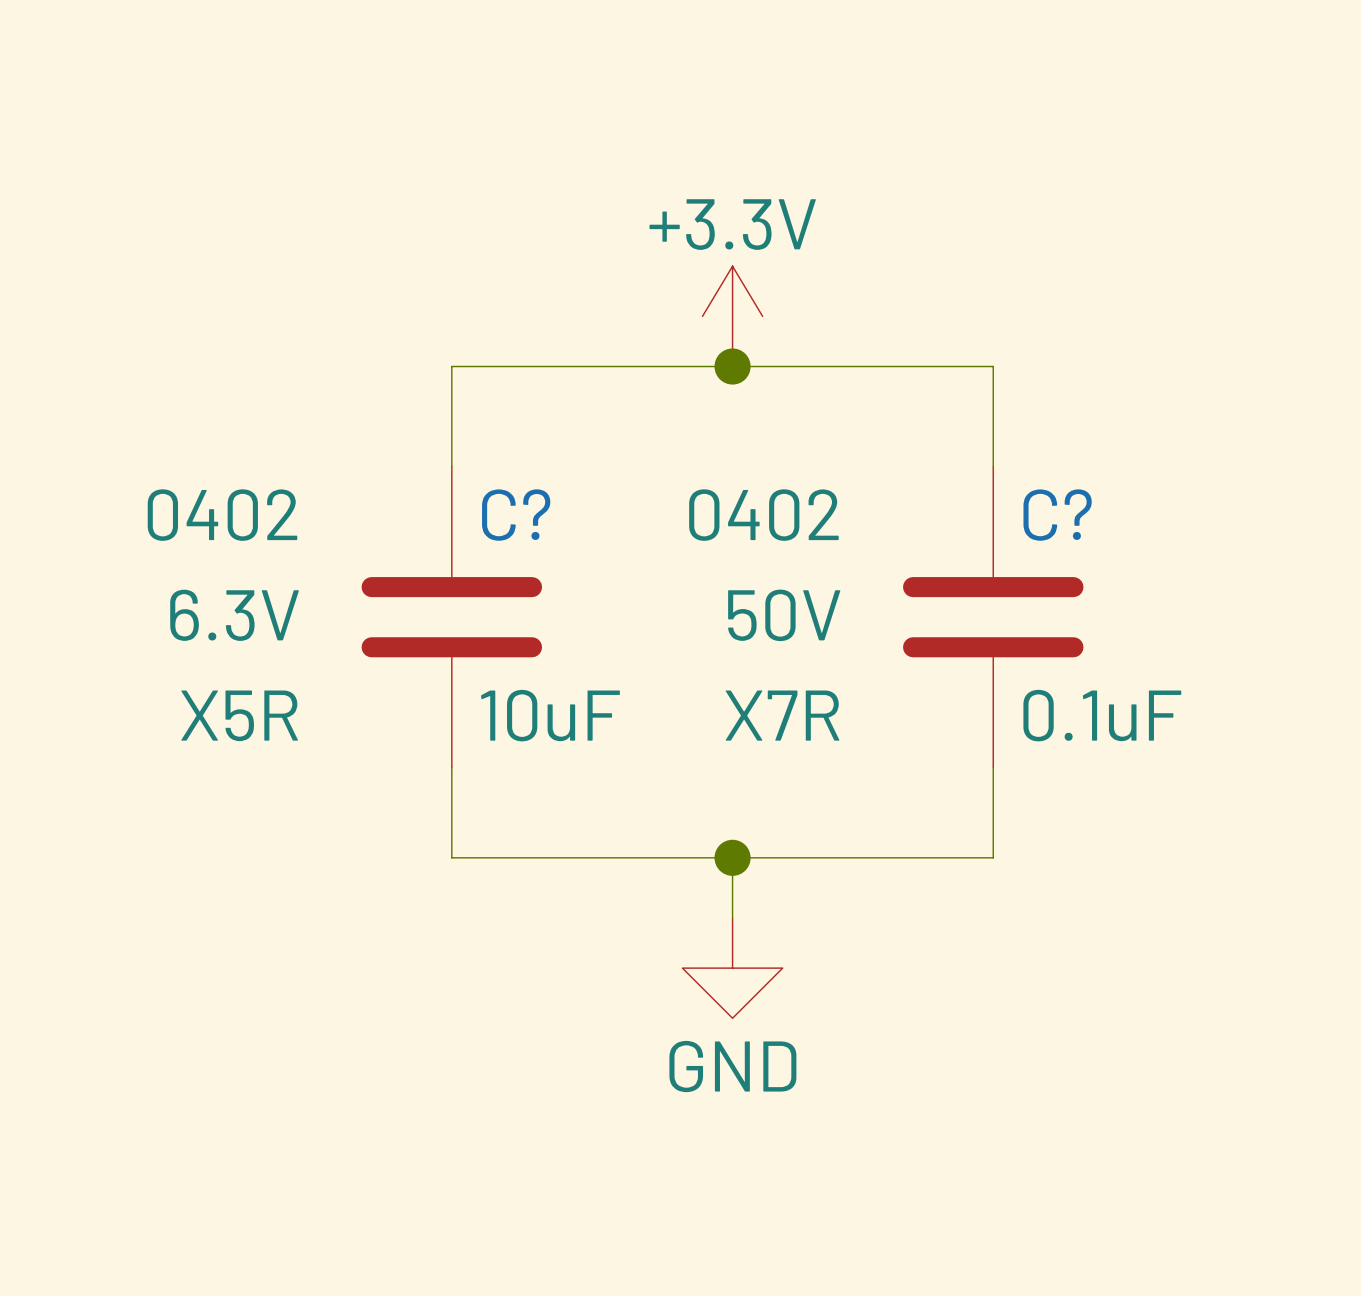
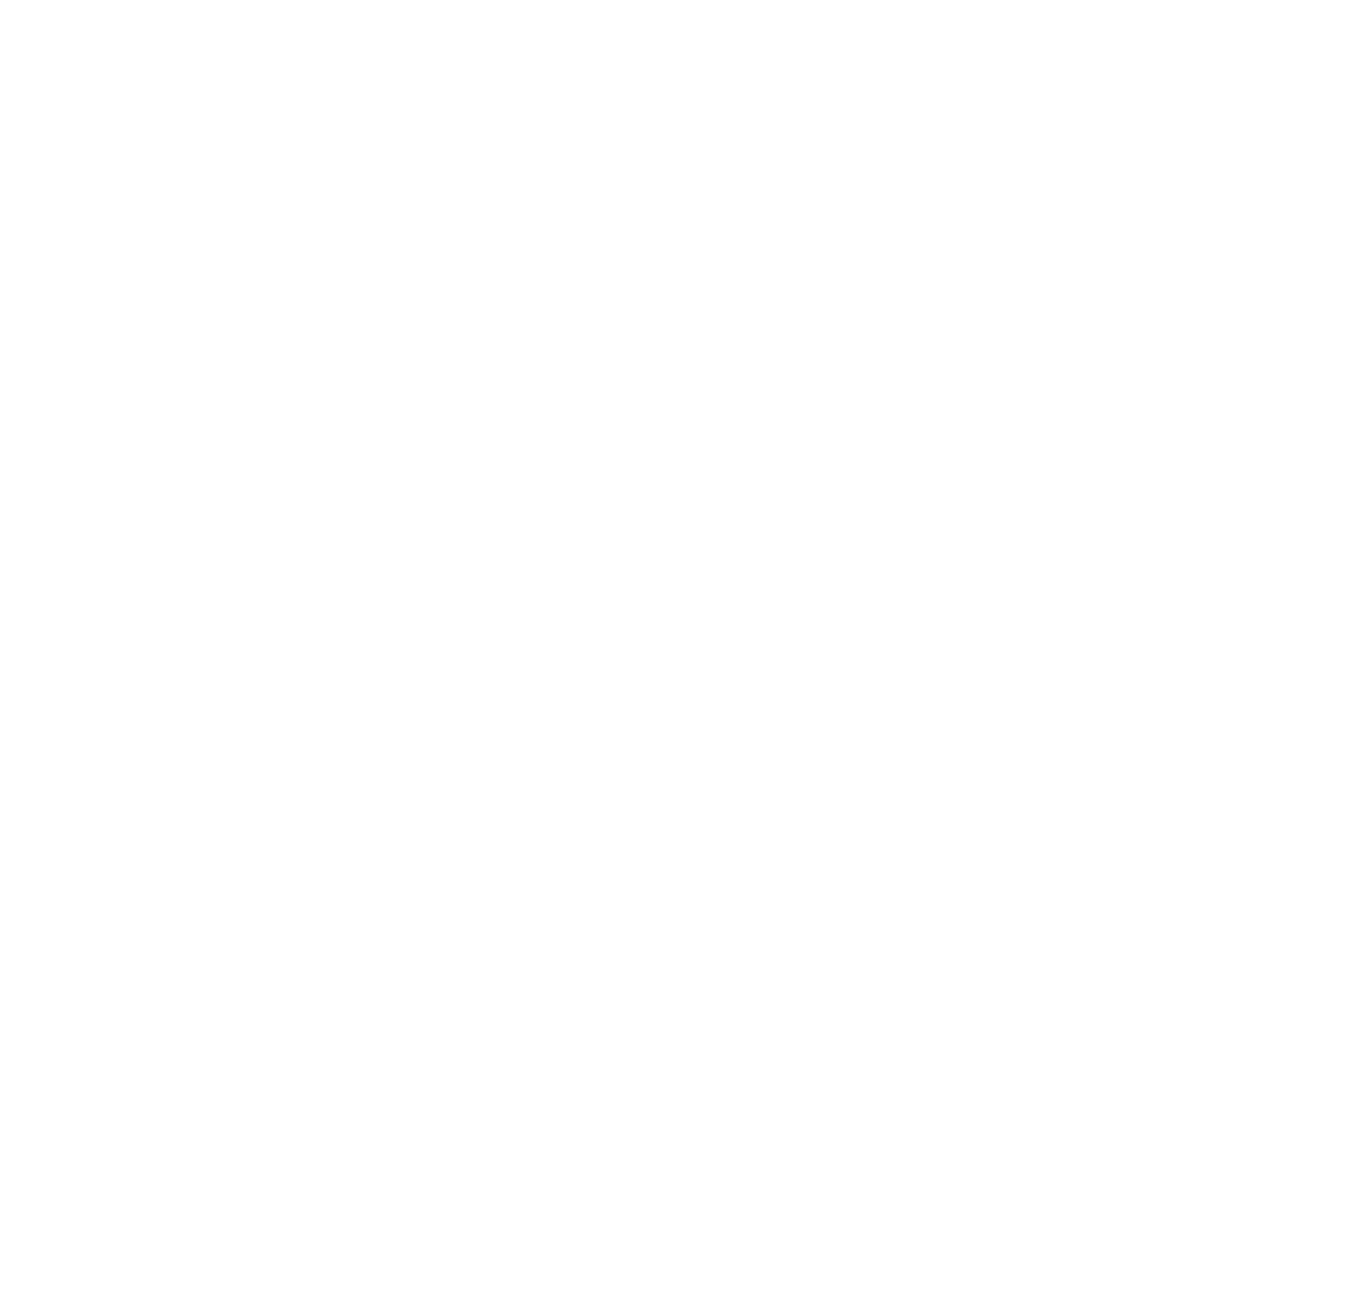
power symbol: +3.3V (732, 316) -> none
junction: (732, 366) -> none
wire: (451, 466) (451, 366) (993, 366) (993, 466) -> none
C?: 10uF (451, 617) -> none
C?: 0.1uF (993, 617) -> none
wire: (451, 767) (451, 857) (993, 857) (993, 767) -> none
wire: (732, 857) (732, 917) -> none
junction: (732, 857) -> none
power symbol: GND (732, 968) -> none

